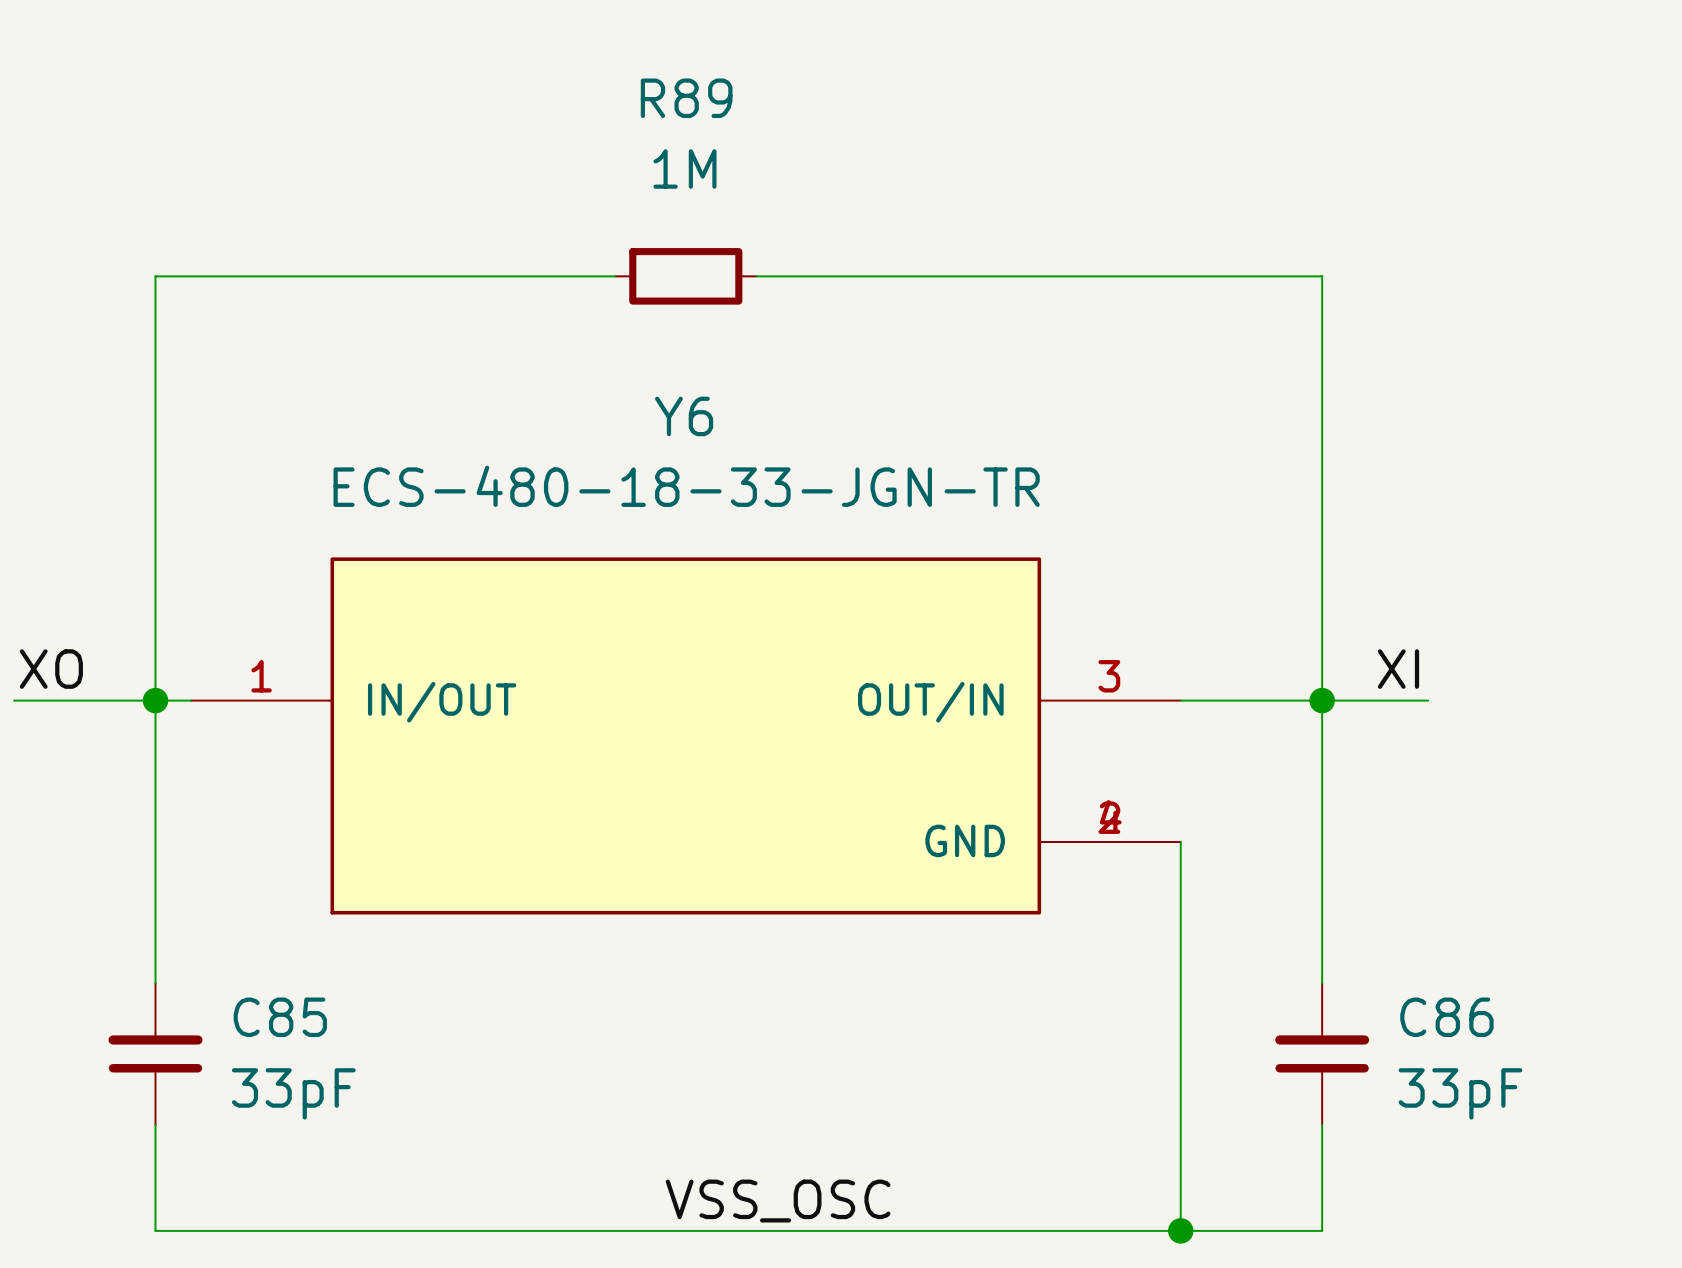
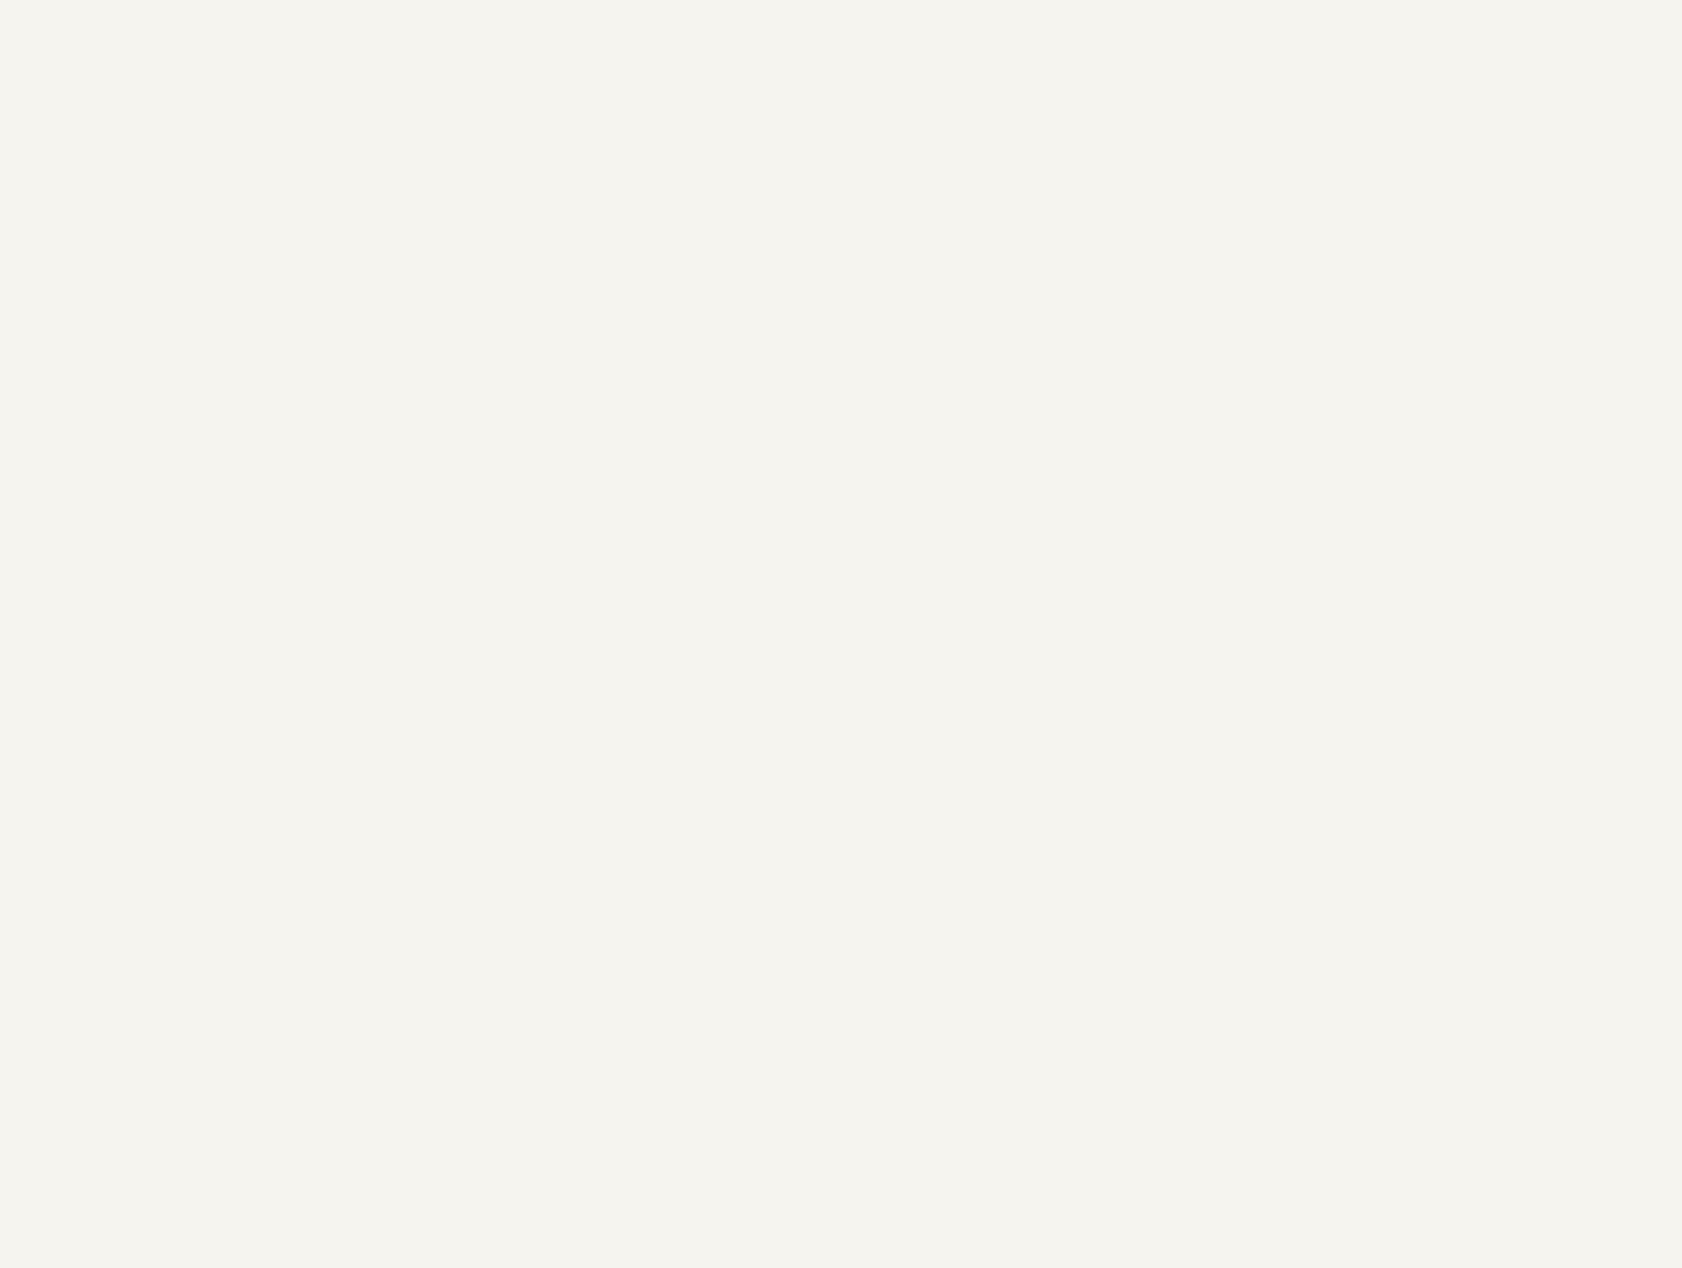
wire: (615, 276) (155, 276) (155, 983) -> none
R89: (685, 276) -> none
wire: (756, 276) (1322, 276) (1322, 983) -> none
label: XO (51, 669) -> none
label: XI (1398, 669) -> none
wire: (14, 700) (190, 700) -> none
junction: (155, 700) -> none
wire: (1180, 700) (1428, 700) -> none
junction: (1322, 700) -> none
Y6: ECS-480-18-33-JGN-TR (685, 735) -> none
wire: (1180, 842) (1180, 1230) -> none
C85: (155, 1054) -> none
C86: (1322, 1054) -> none
wire: (155, 1124) (155, 1230) (1322, 1230) (1322, 1124) -> none
label: VSS_OSC (778, 1201) -> none
junction: (1180, 1230) -> none

